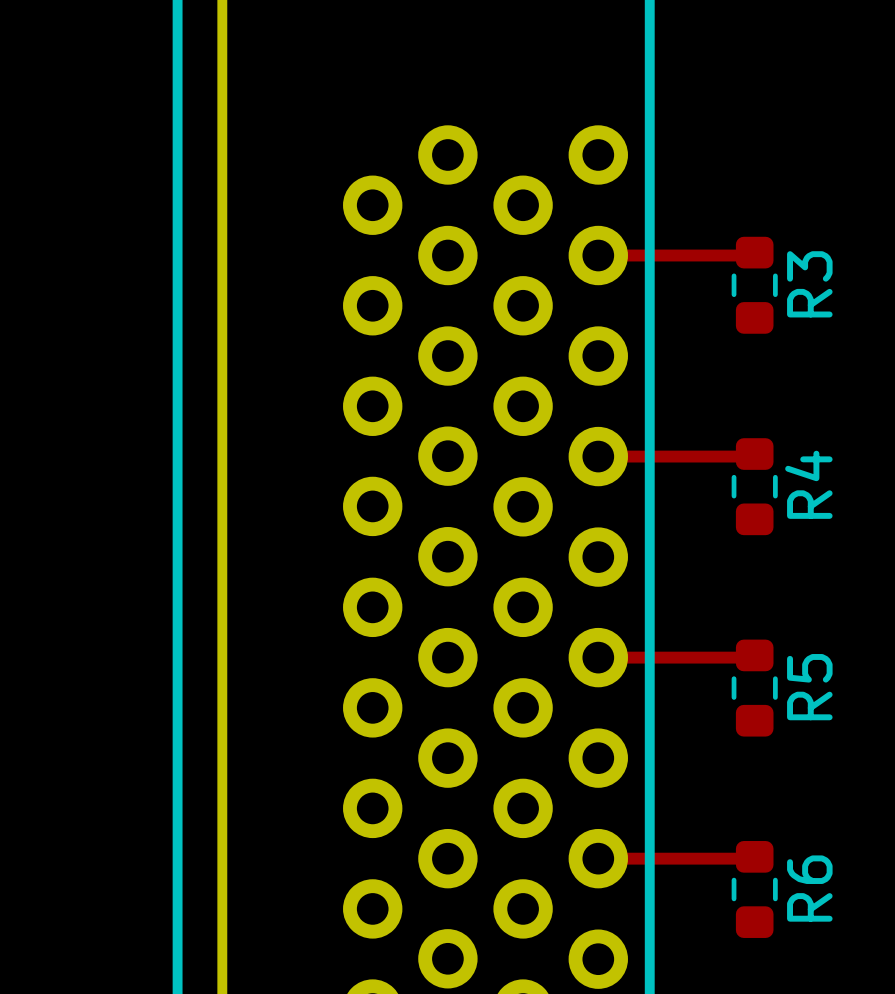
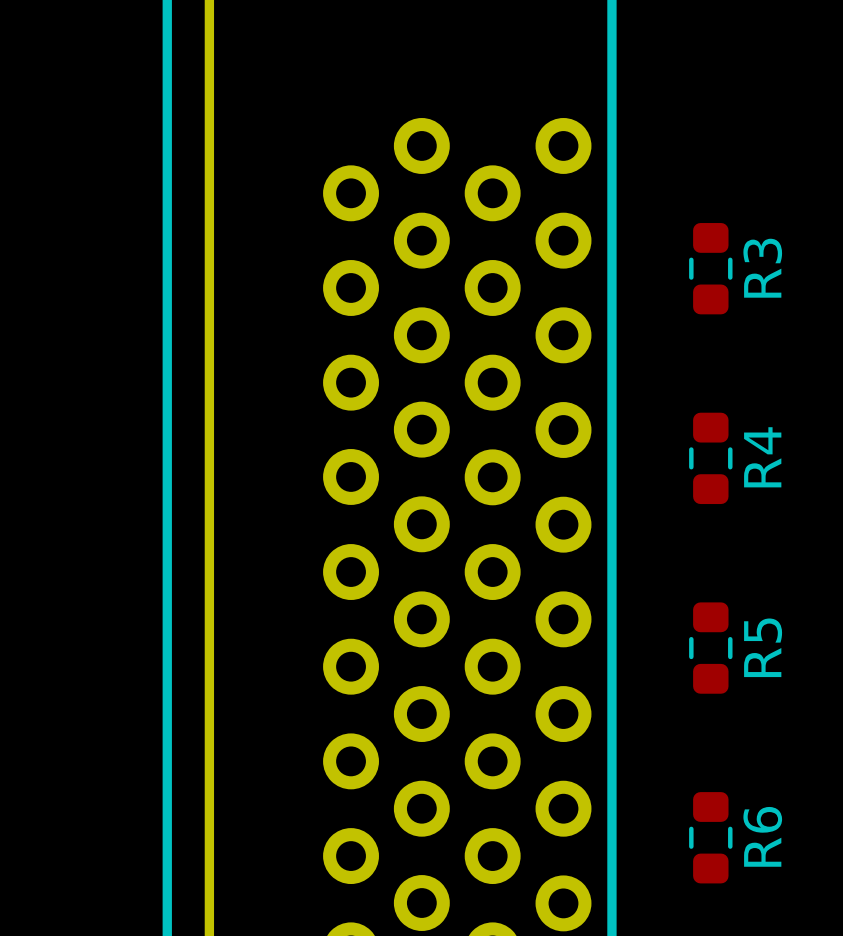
track: (754, 252) (751, 255) (598, 255) -> none
track: (754, 454) (752, 456) (598, 456) -> none
track: (754, 655) (752, 657) (598, 657) -> none
track: (754, 856) (752, 858) (598, 858) -> none

